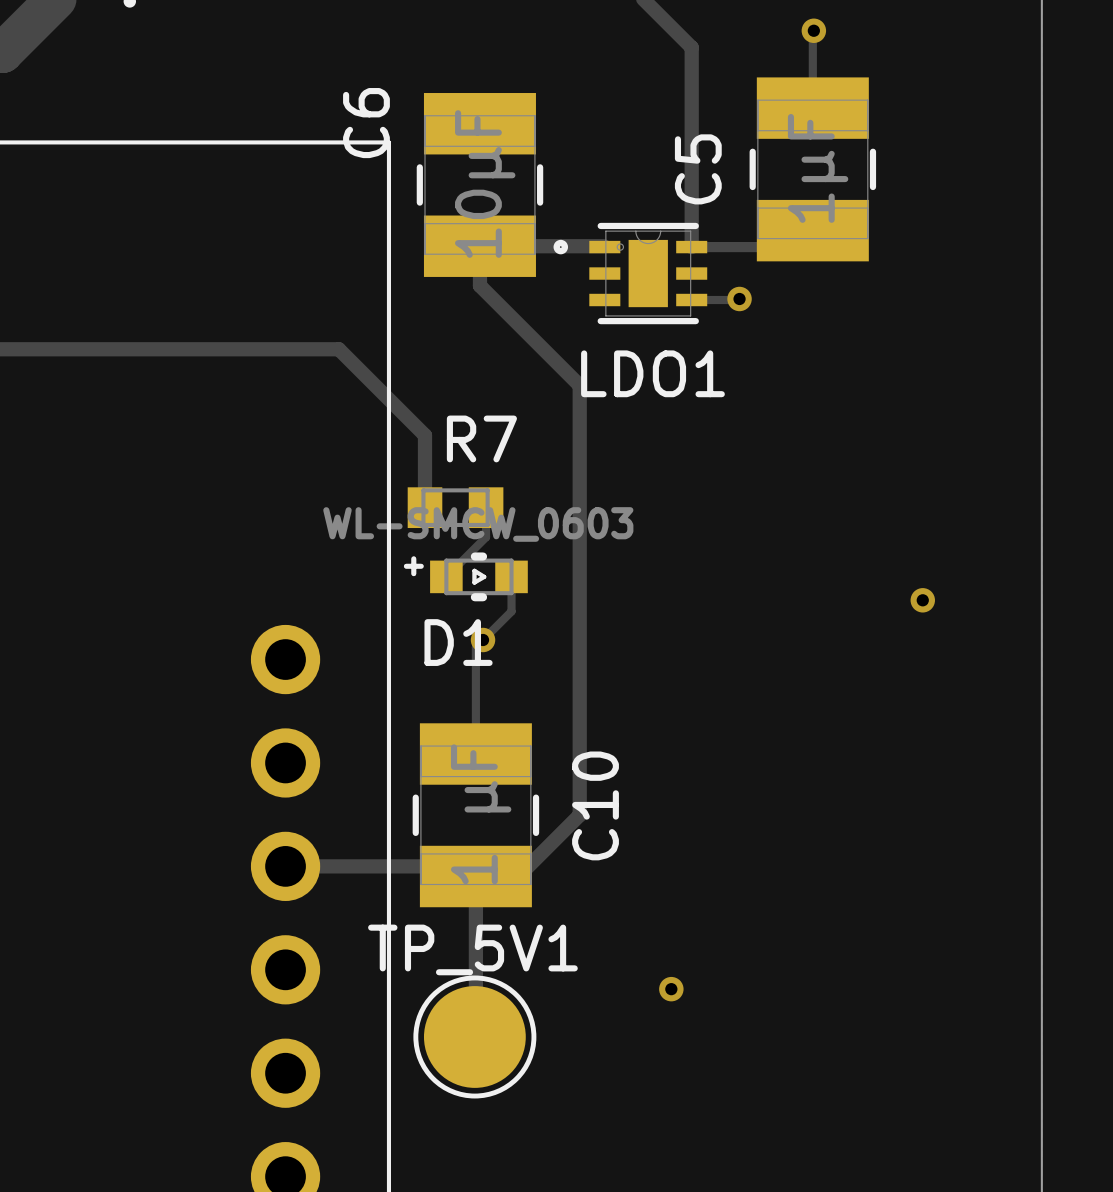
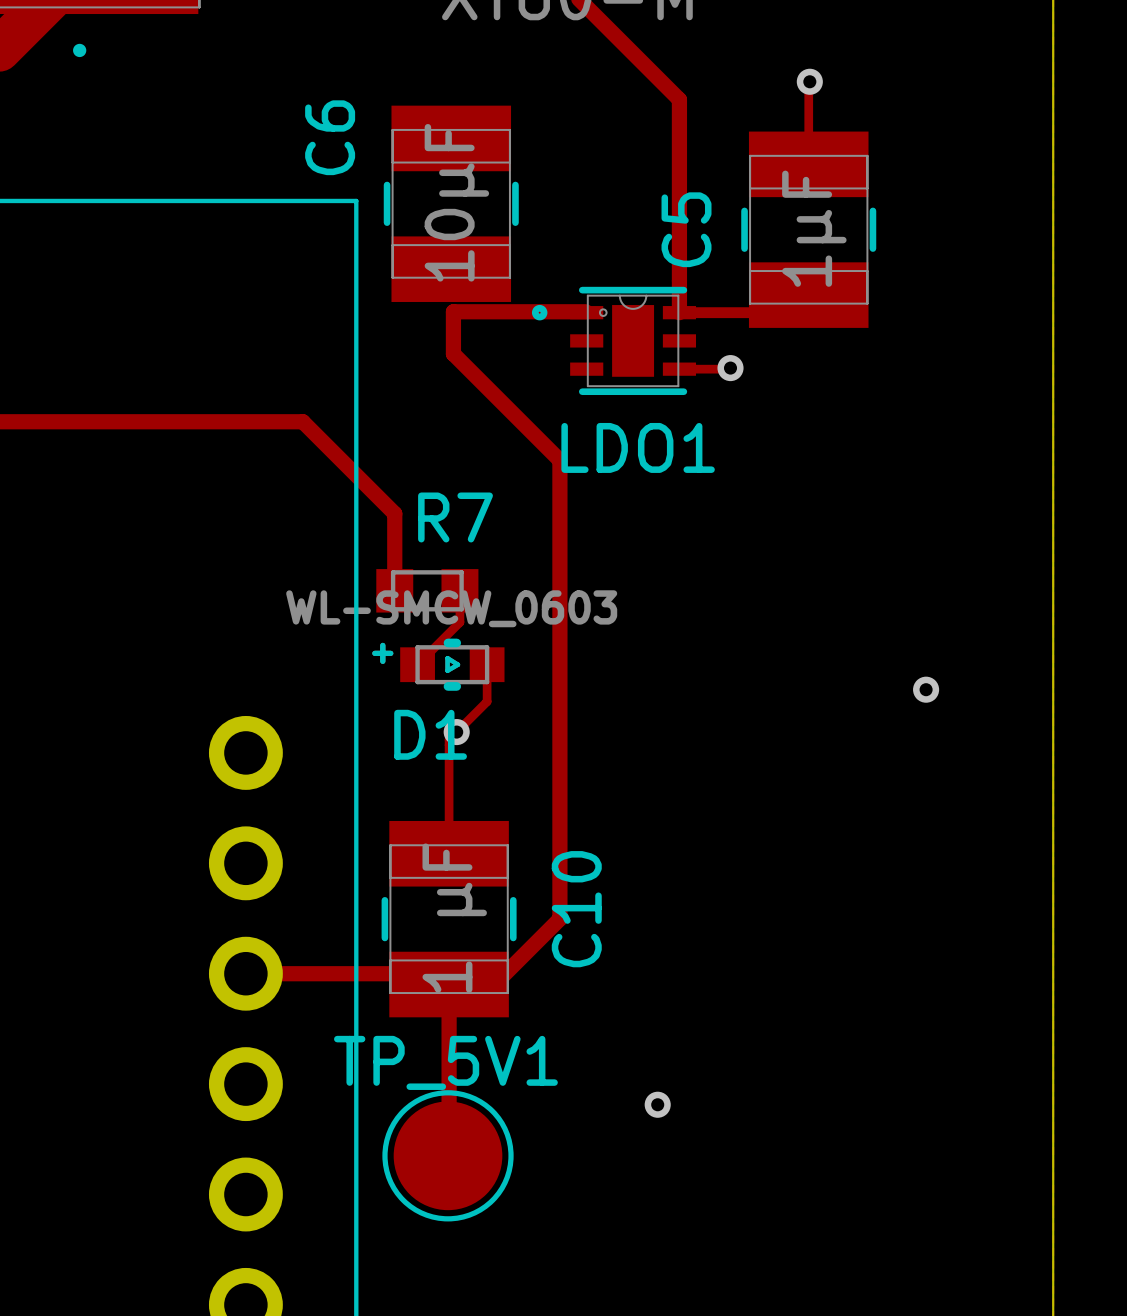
C6 position: (479, 184) -> (451, 203)

